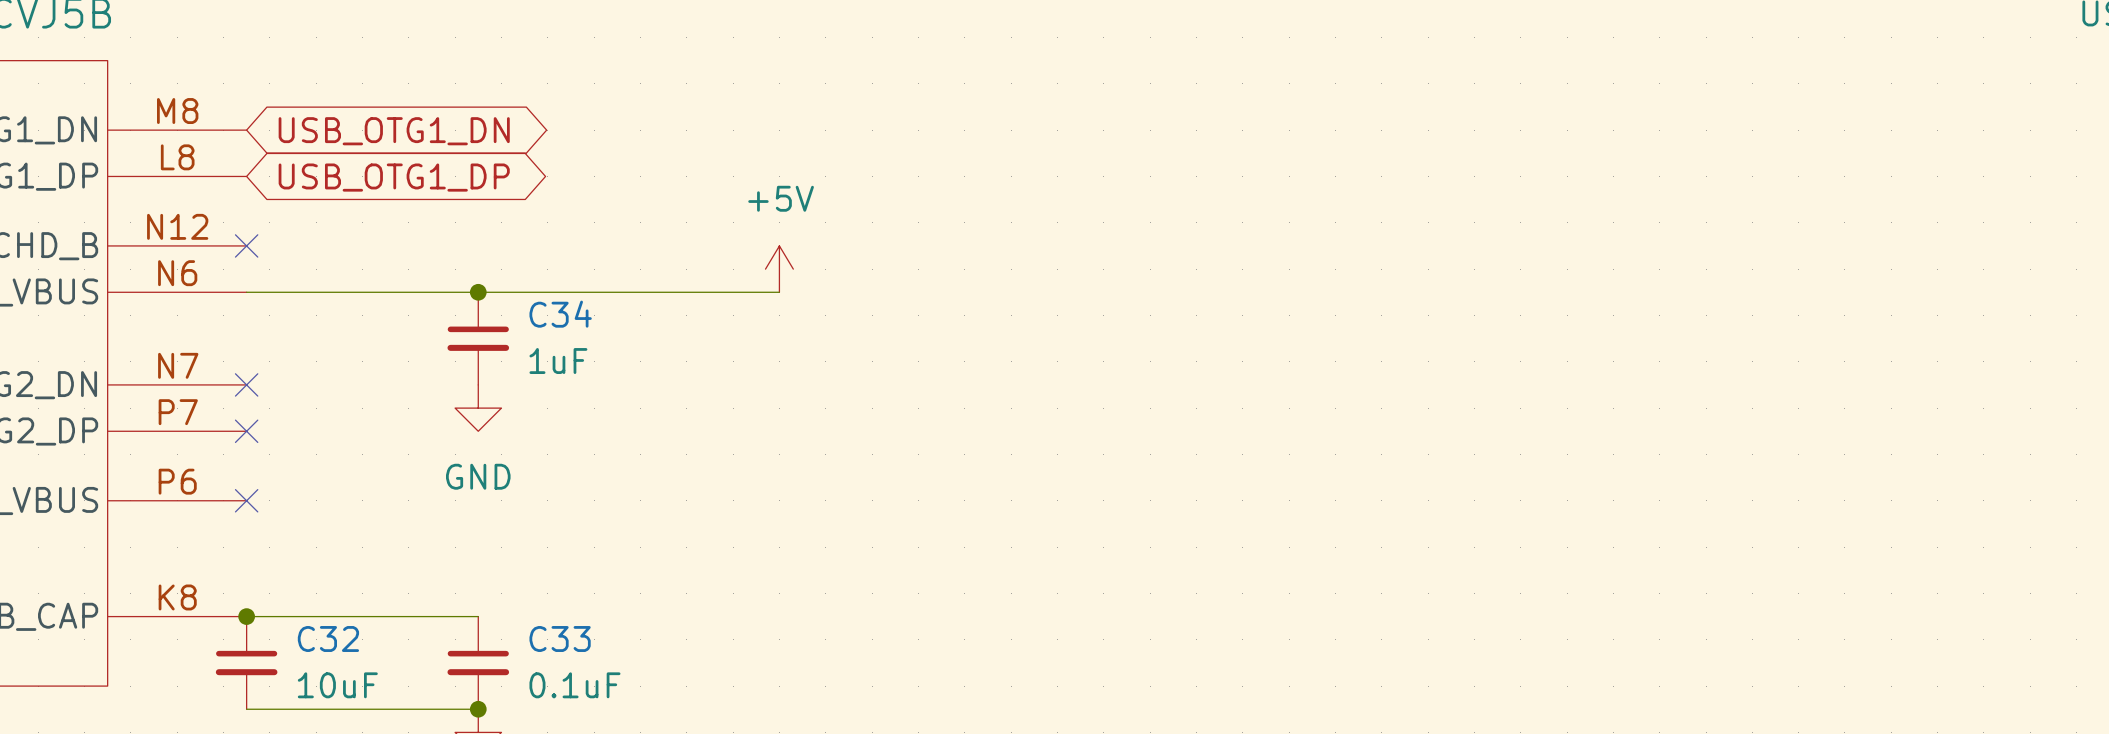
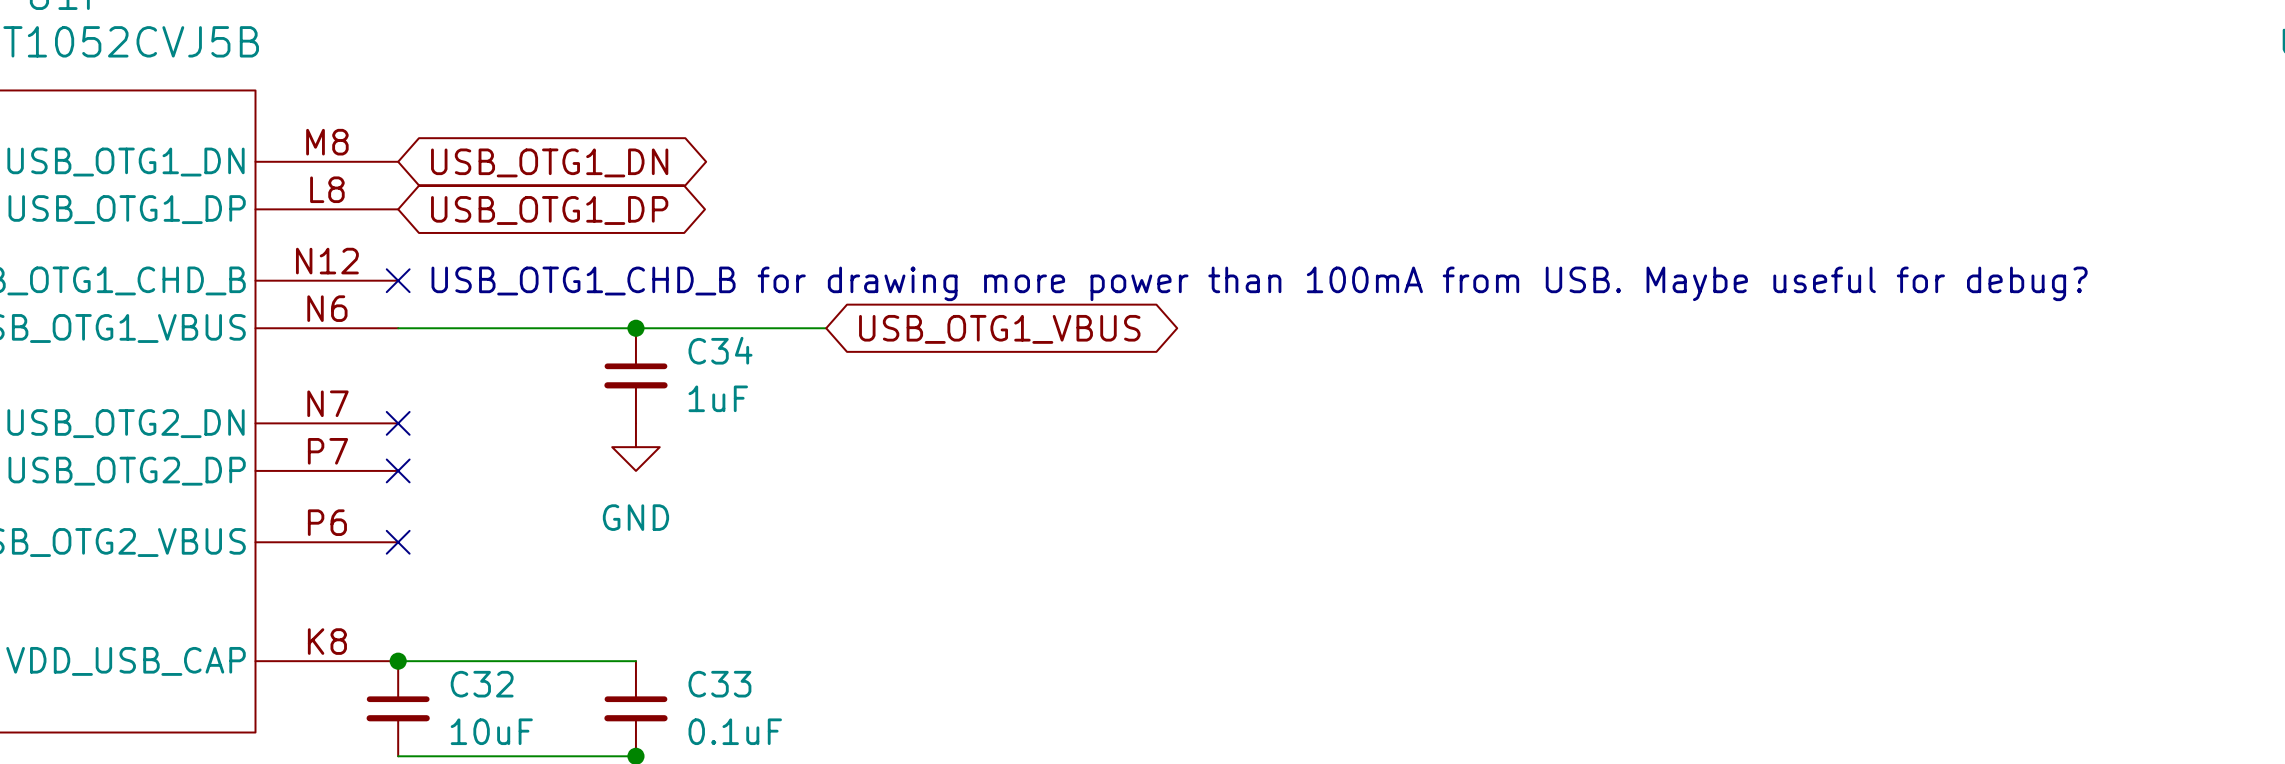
text: none -> USB_OTG1_CHD_B for drawing more power than 100mA from USB. Maybe useful for debug? (1259, 283)
power symbol: +5V (779, 269) -> none
wire: (663, 292) (779, 292) -> none
global label: none -> USB_OTG1_VBUS (999, 329)

